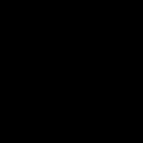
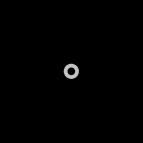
via: none -> (71, 71)

